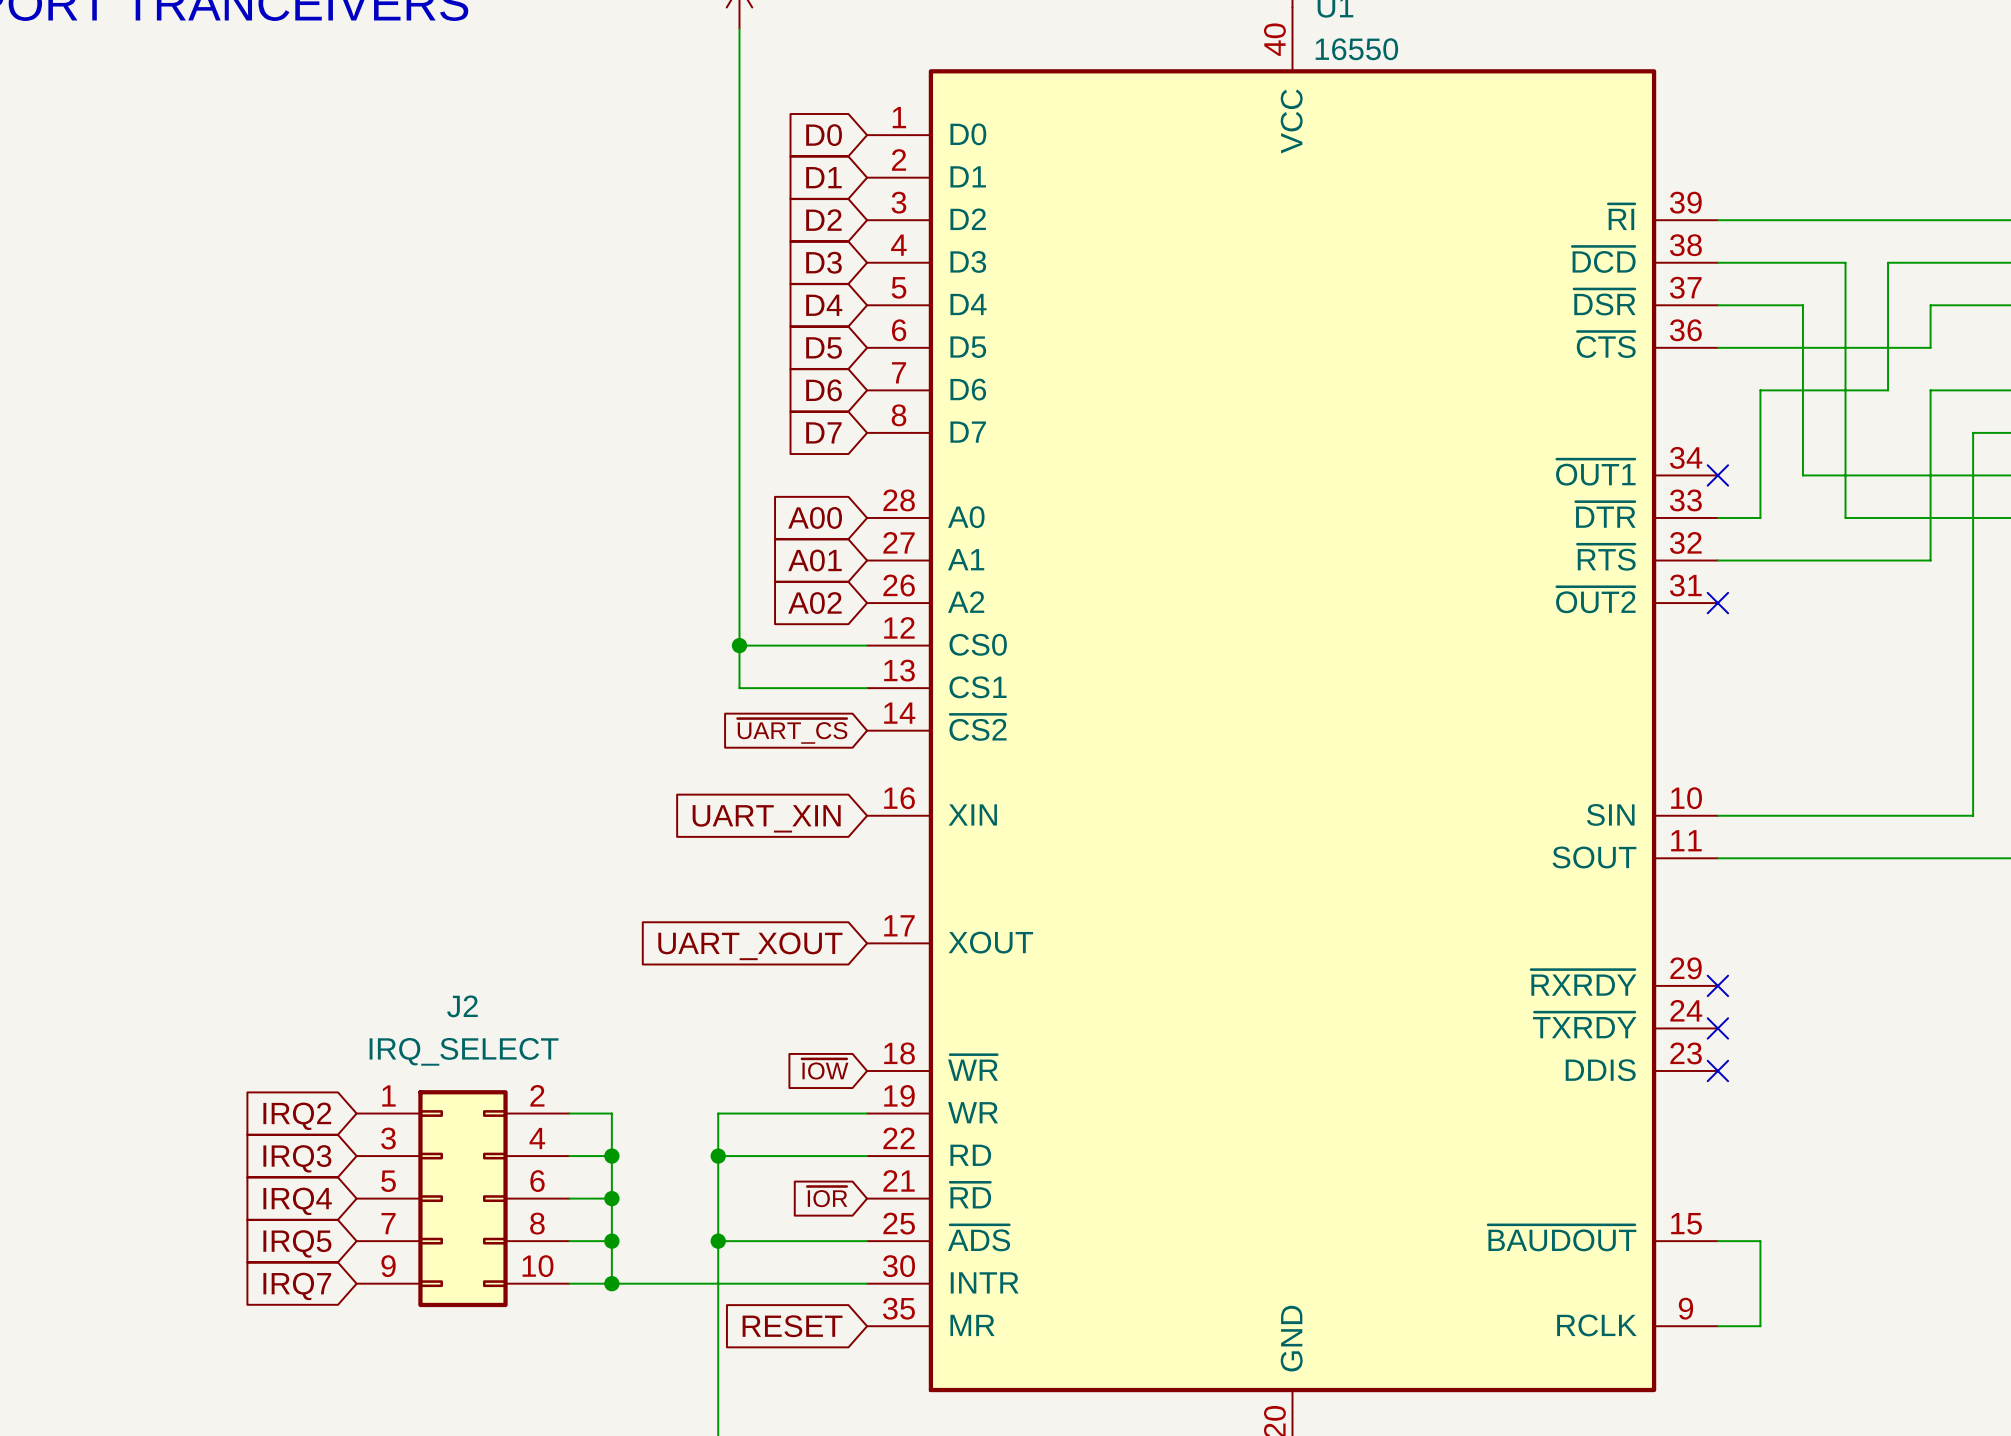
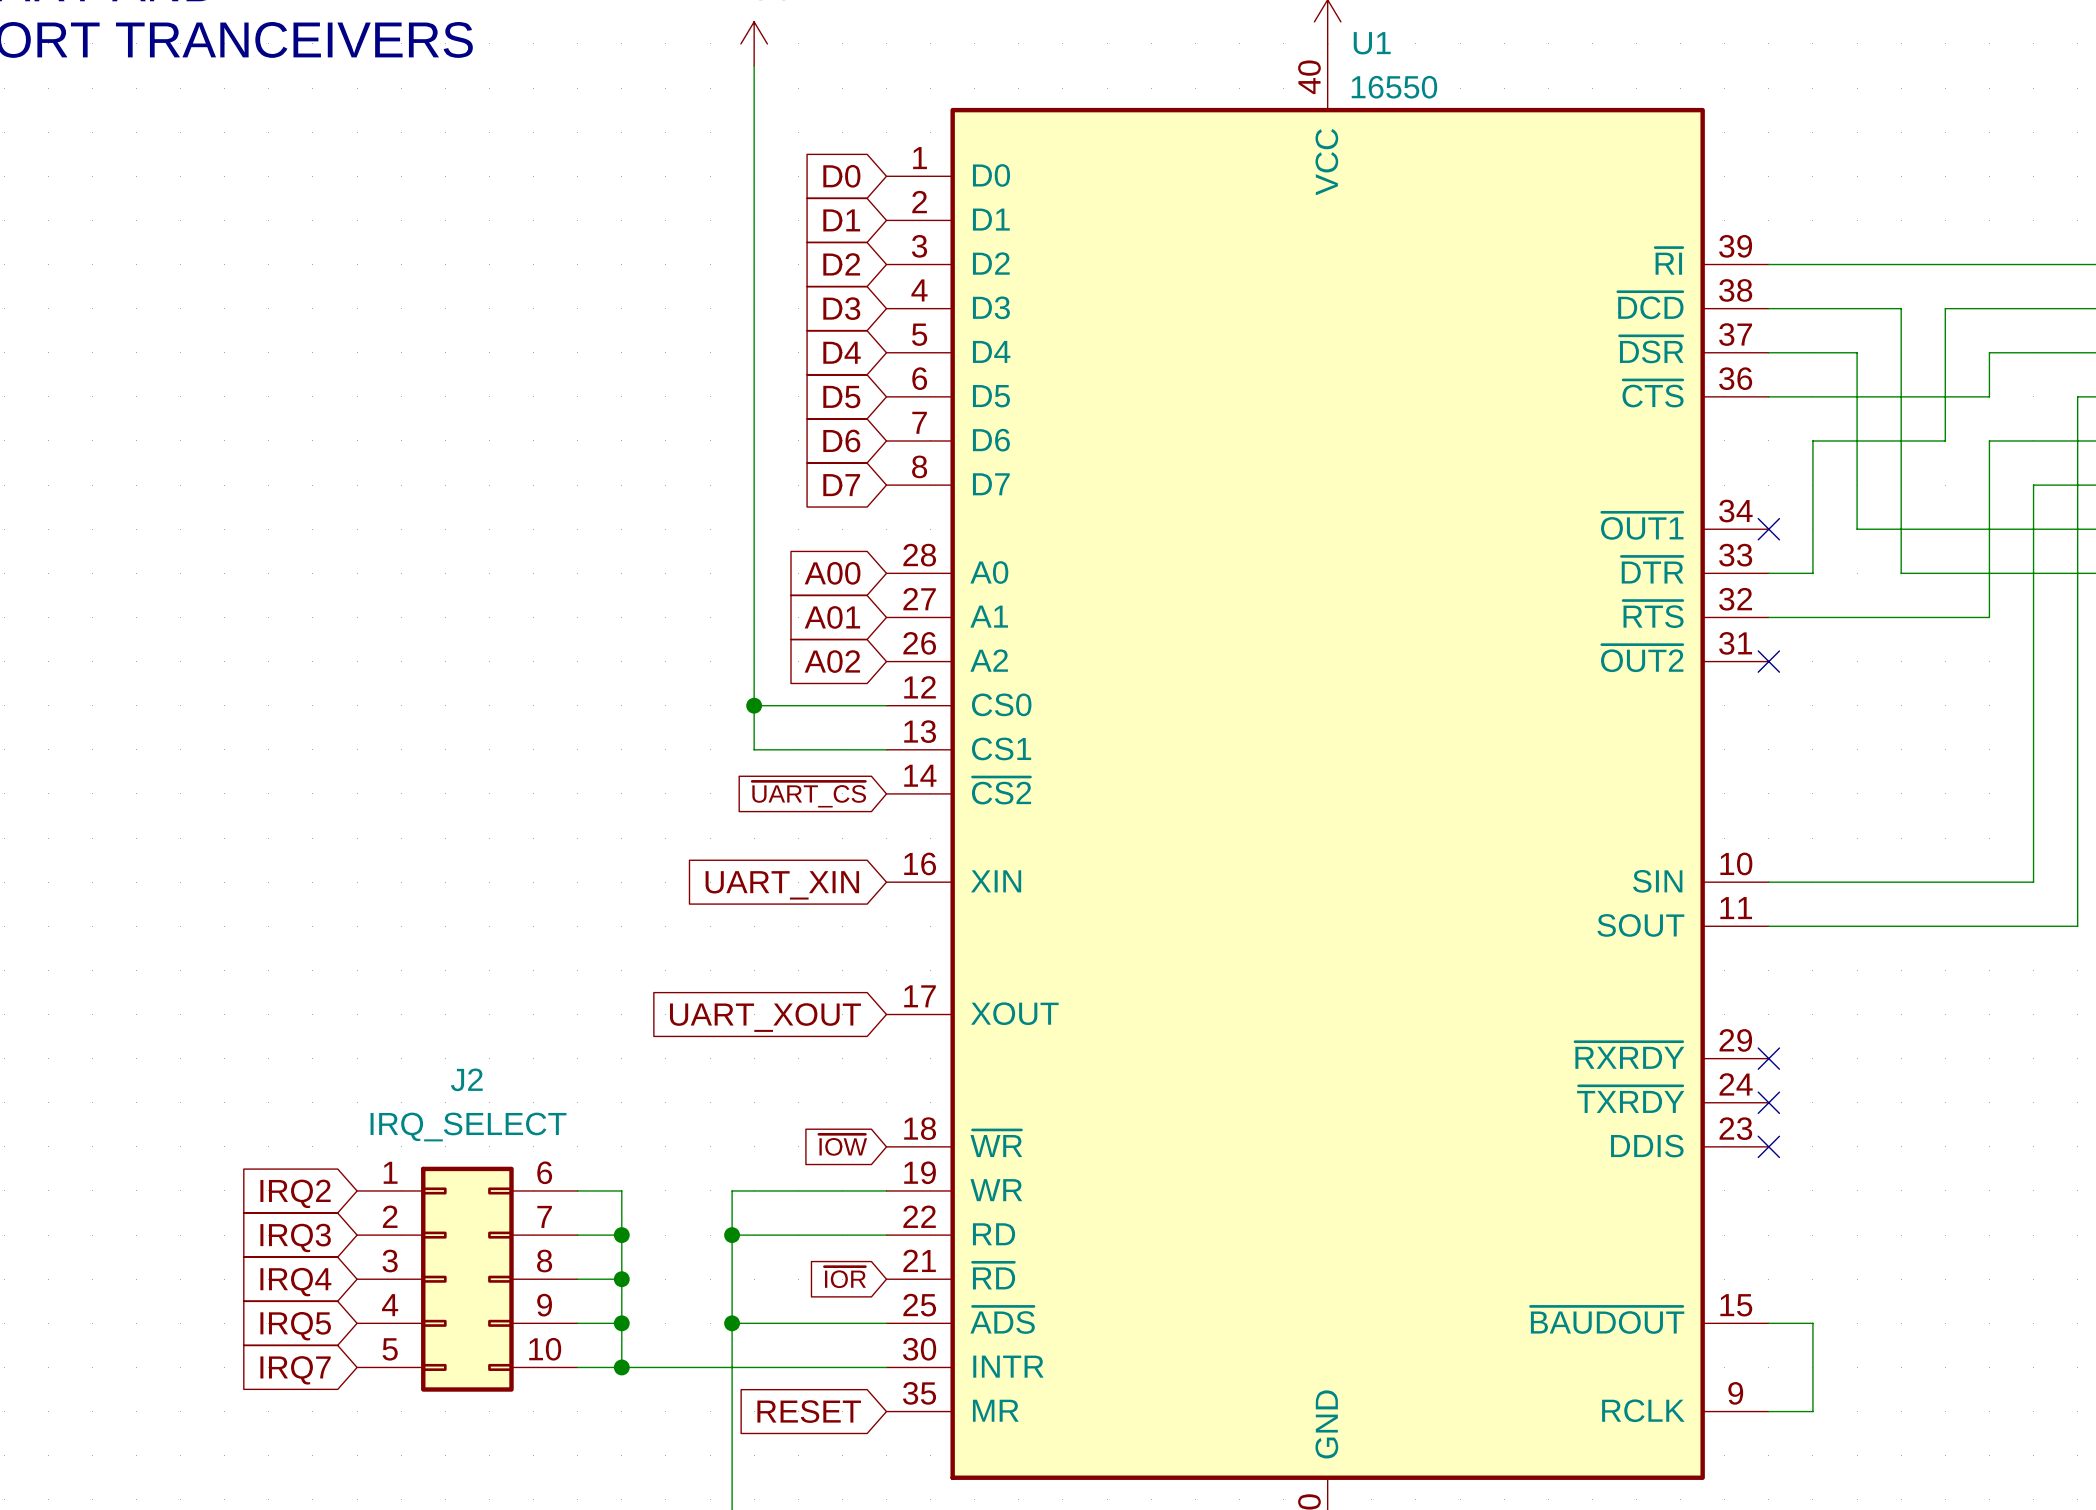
J2 pin number: 2 (537, 1095) -> 6 (544, 1172)
J2 pin number: 3 (388, 1138) -> 2 (390, 1216)
J2 pin number: 4 (537, 1138) -> 7 (544, 1216)
J2 pin number: 5 (388, 1181) -> 3 (390, 1261)
J2 pin number: 6 (537, 1181) -> 8 (544, 1261)
J2 pin number: 7 (388, 1223) -> 4 (390, 1305)
J2 pin number: 8 (537, 1223) -> 9 (544, 1305)
J2 pin number: 9 (388, 1266) -> 5 (390, 1349)

